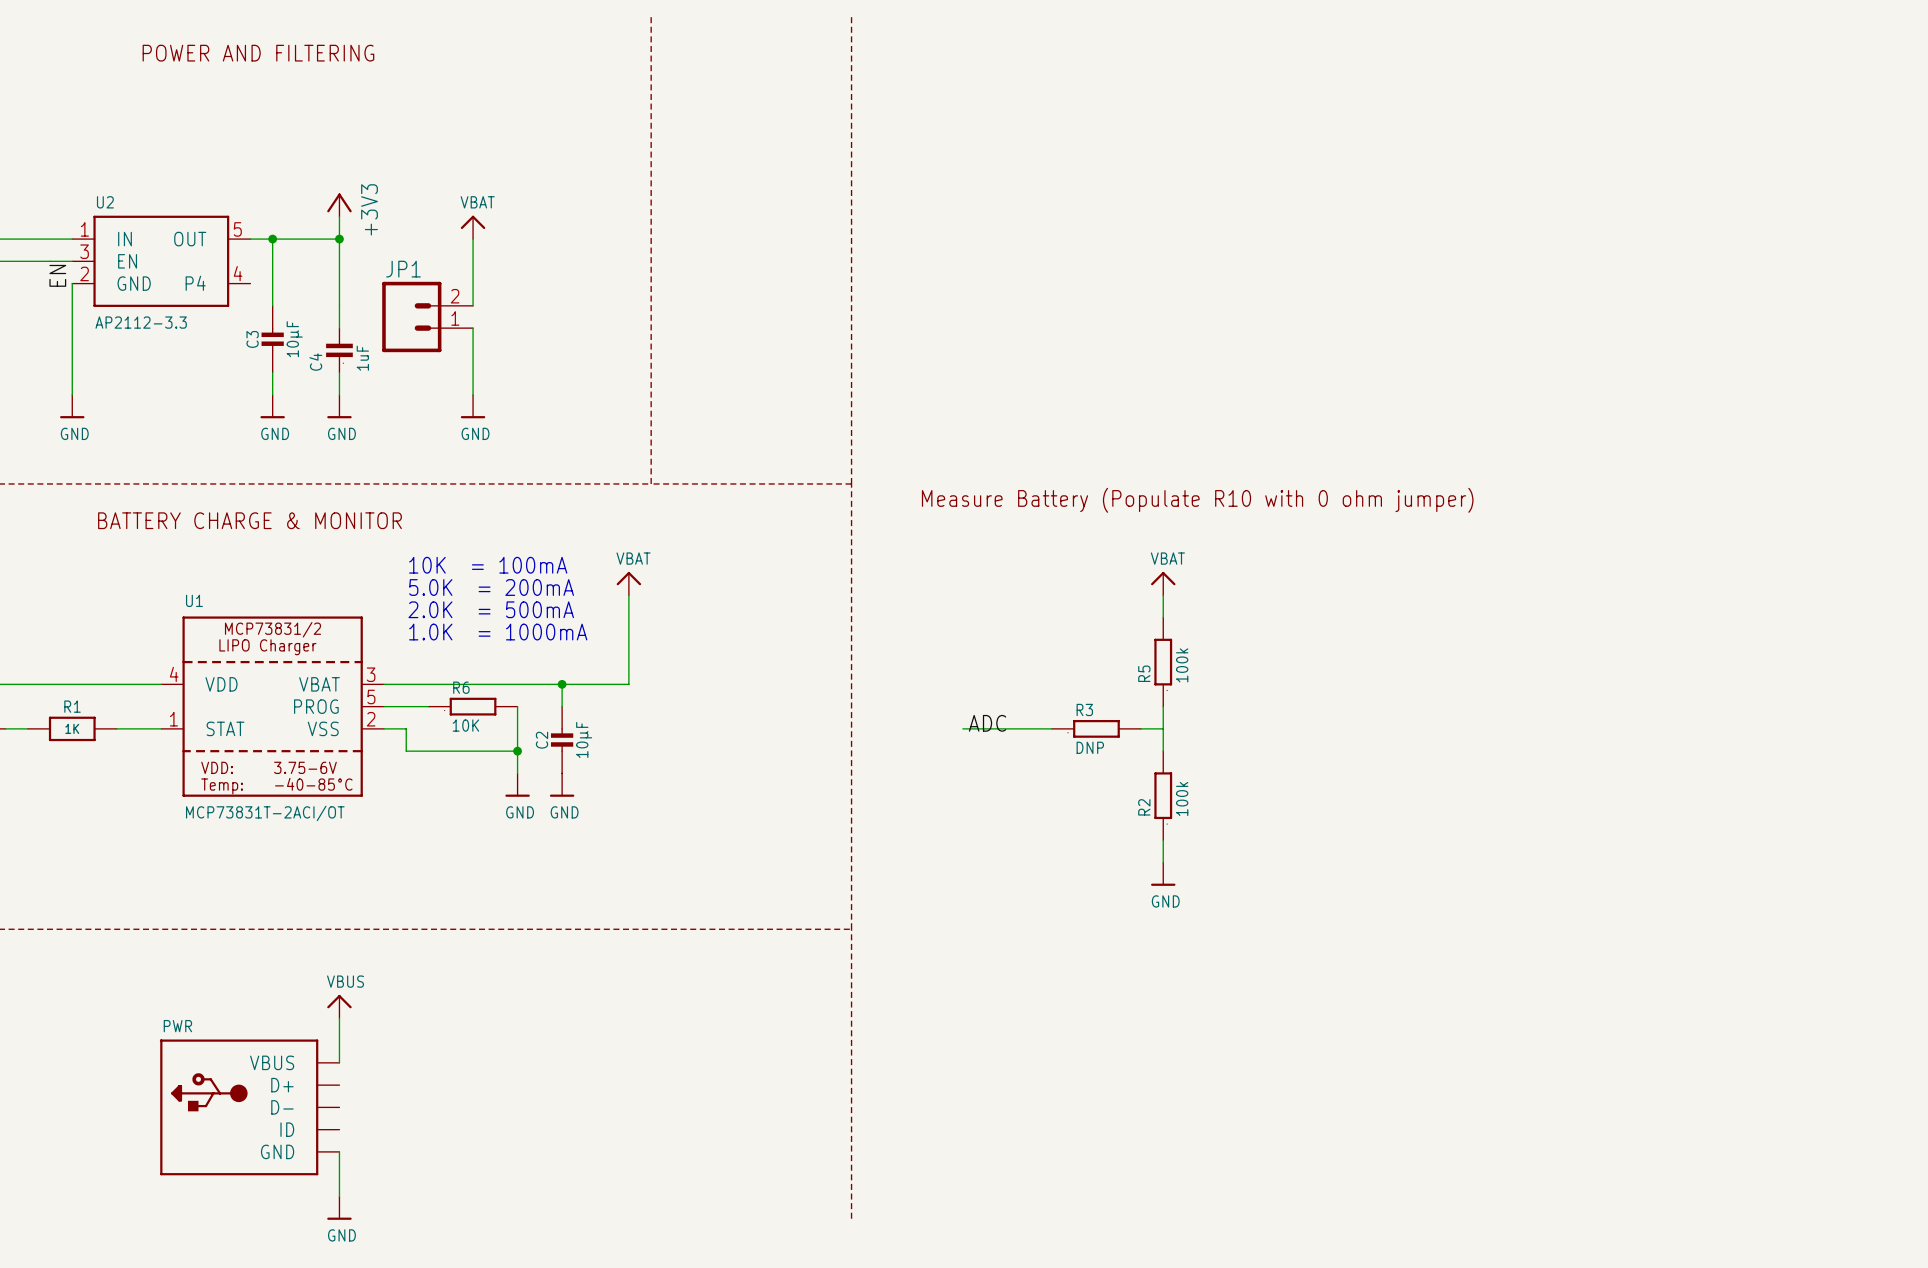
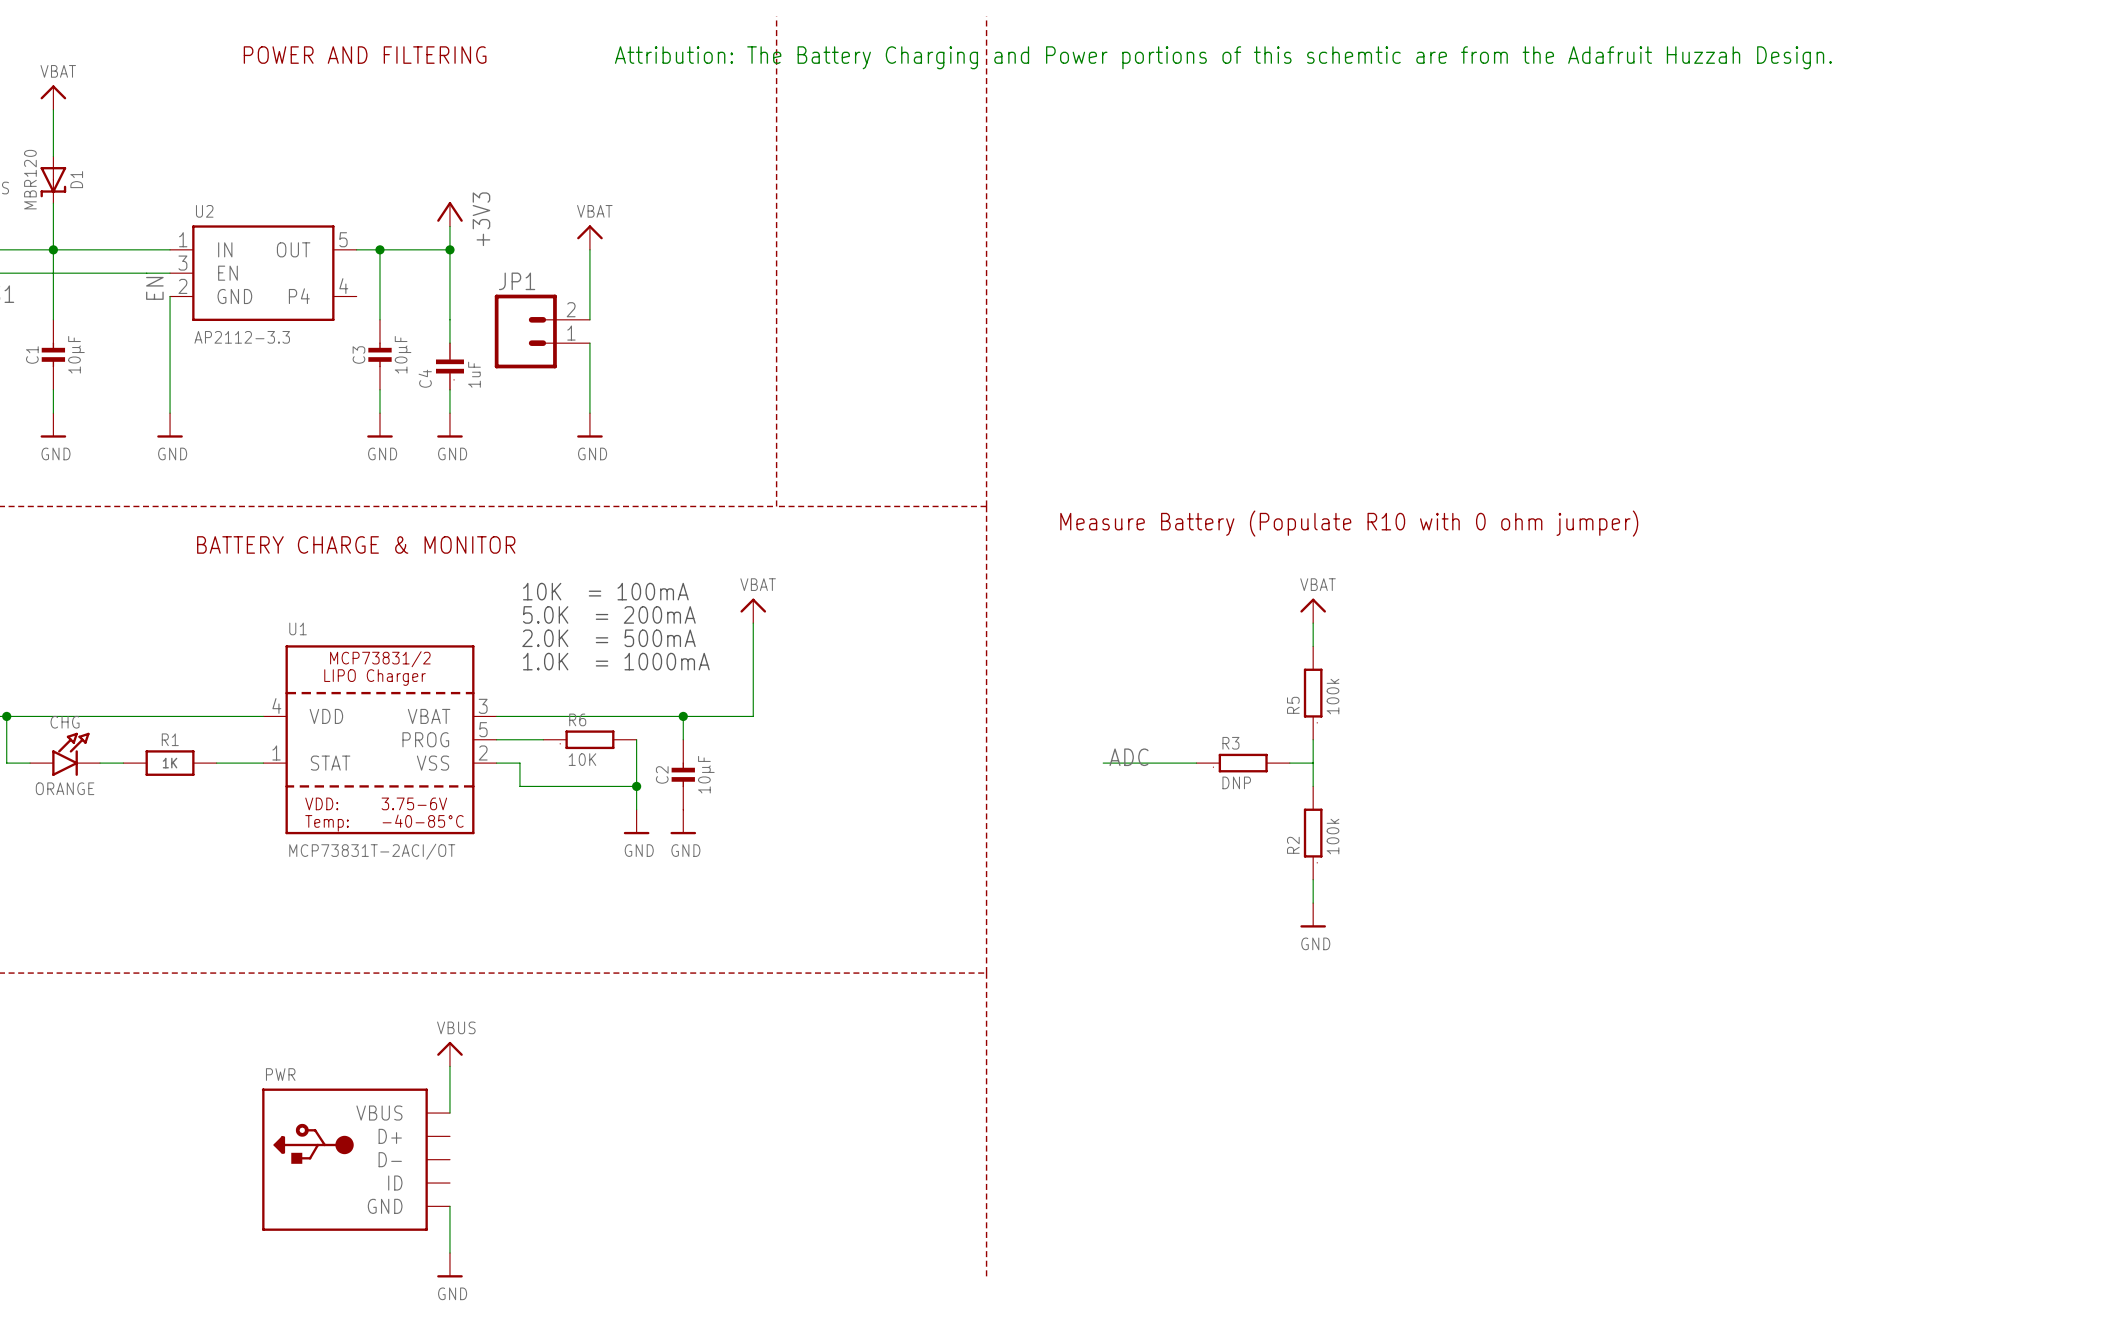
text: none -> Attribution: The Battery Charging and Power portions of this schemtic are from the Adafruit Huzzah Design. (1223, 57)

